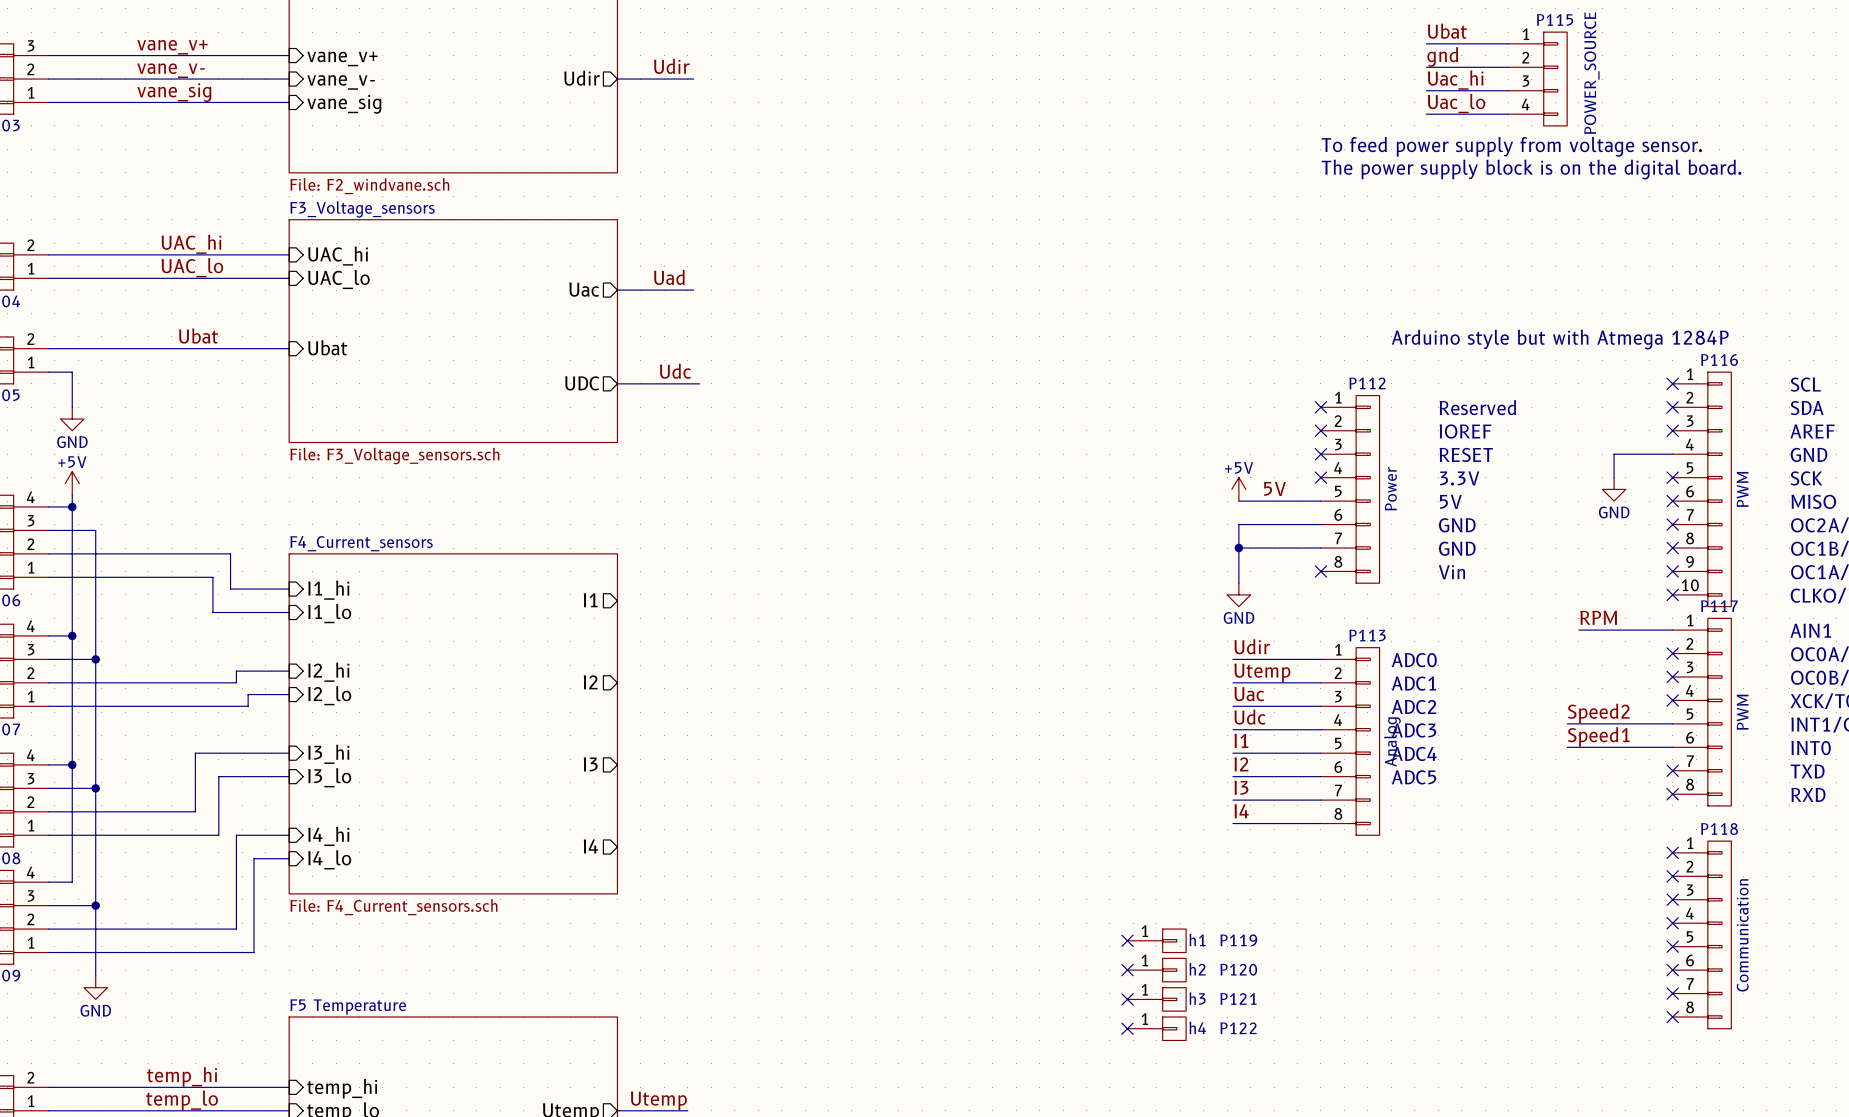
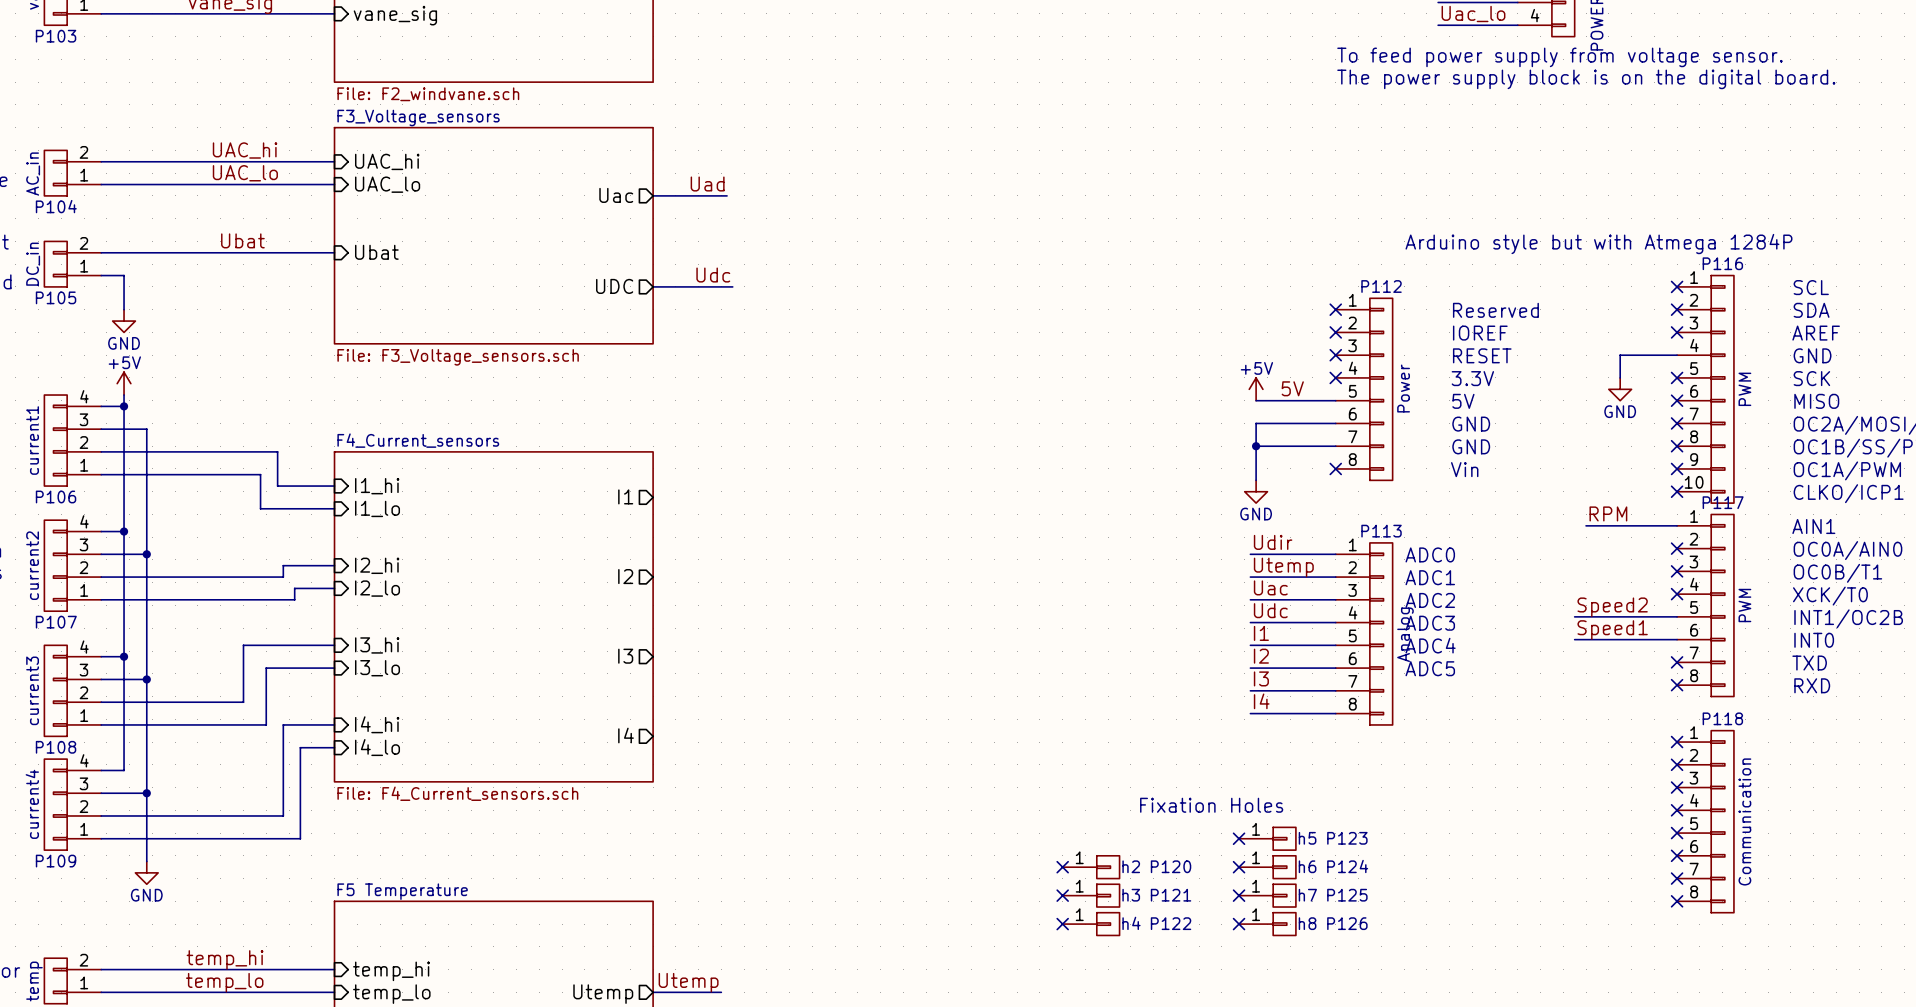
text: none -> Fixation Holes (1211, 805)
no-connect mark: (1127, 940) -> none
P119: h1 (1156, 940) -> none
no-connect mark: none -> (1239, 838)
P123: none -> h5 (1267, 838)
no-connect mark: (1127, 970) -> none
P120 position: (1156, 970) -> (1091, 867)
no-connect mark: none -> (1062, 867)
no-connect mark: none -> (1239, 867)
P124: none -> h6 (1267, 867)
no-connect mark: (1127, 999) -> none
P121 position: (1156, 999) -> (1091, 895)
no-connect mark: none -> (1062, 895)
no-connect mark: none -> (1239, 895)
P125: none -> h7 (1267, 895)
no-connect mark: (1127, 1028) -> none
P122 position: (1156, 1028) -> (1091, 924)
no-connect mark: none -> (1062, 924)
no-connect mark: none -> (1239, 924)
P126: none -> h8 (1267, 924)

